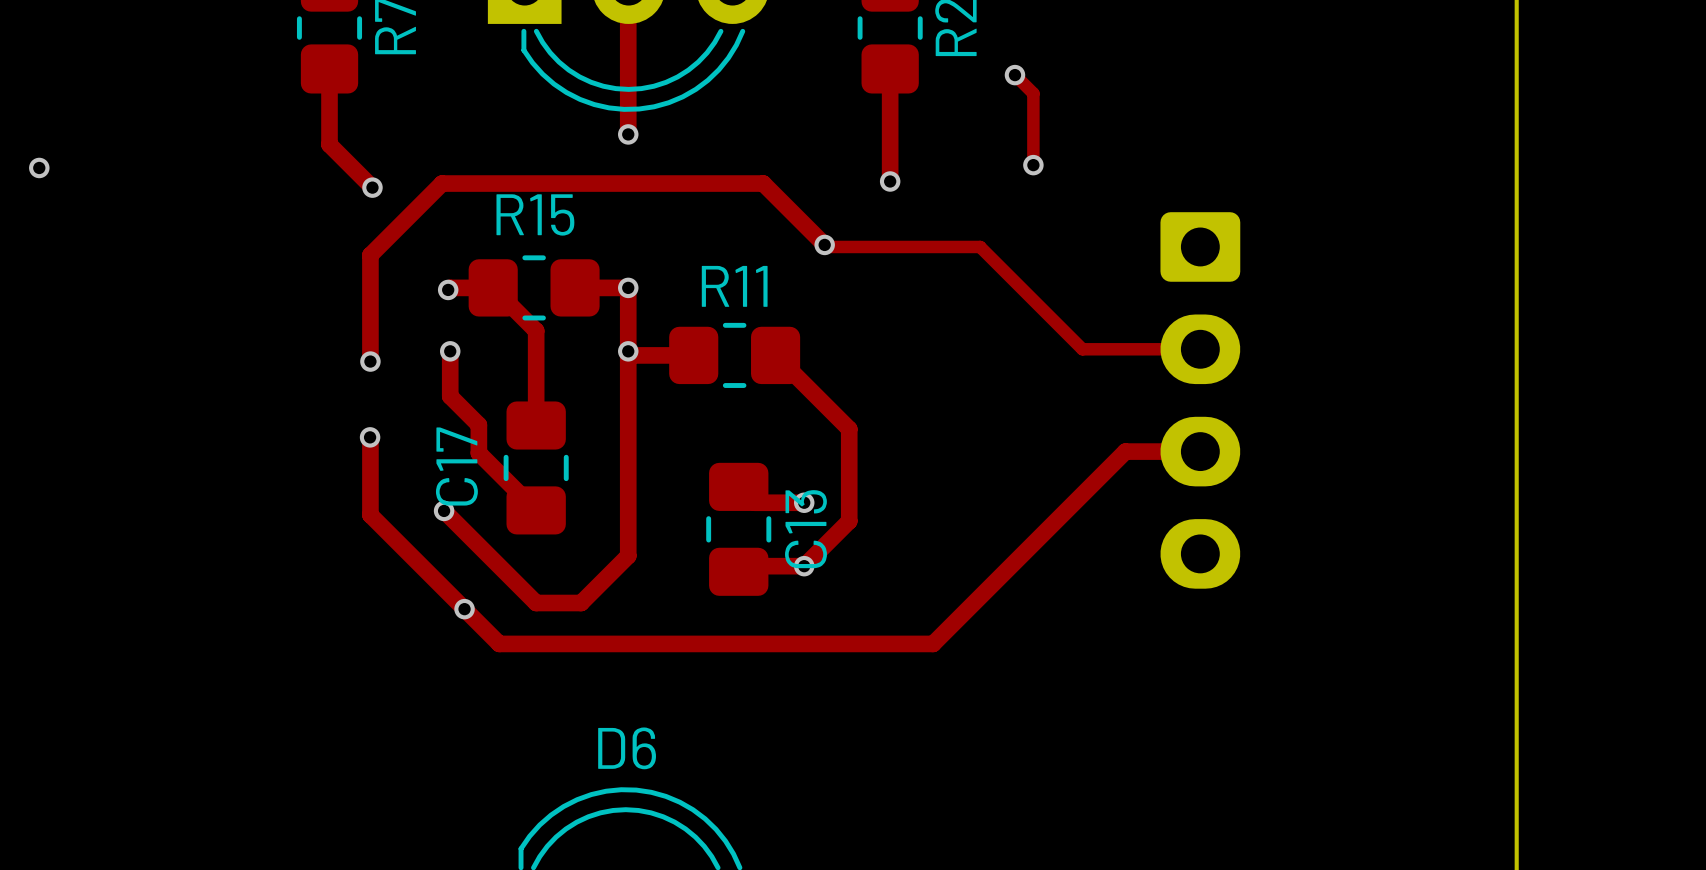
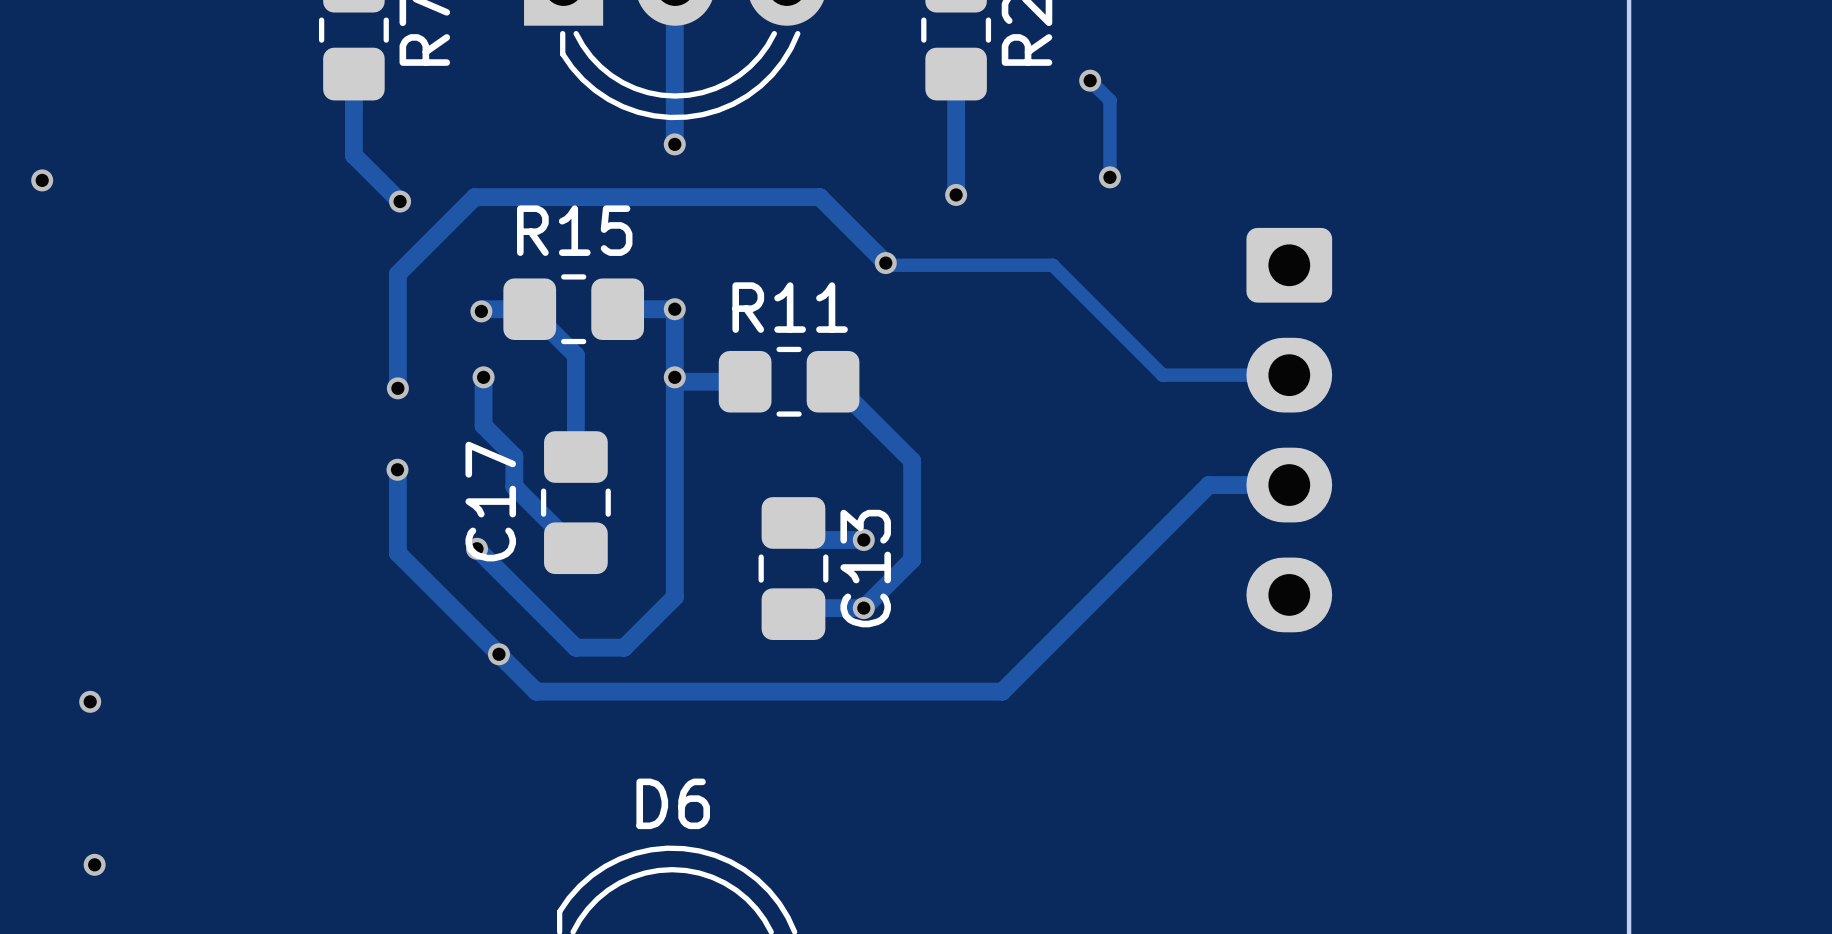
via: none -> (90, 701)
via: none -> (94, 864)

